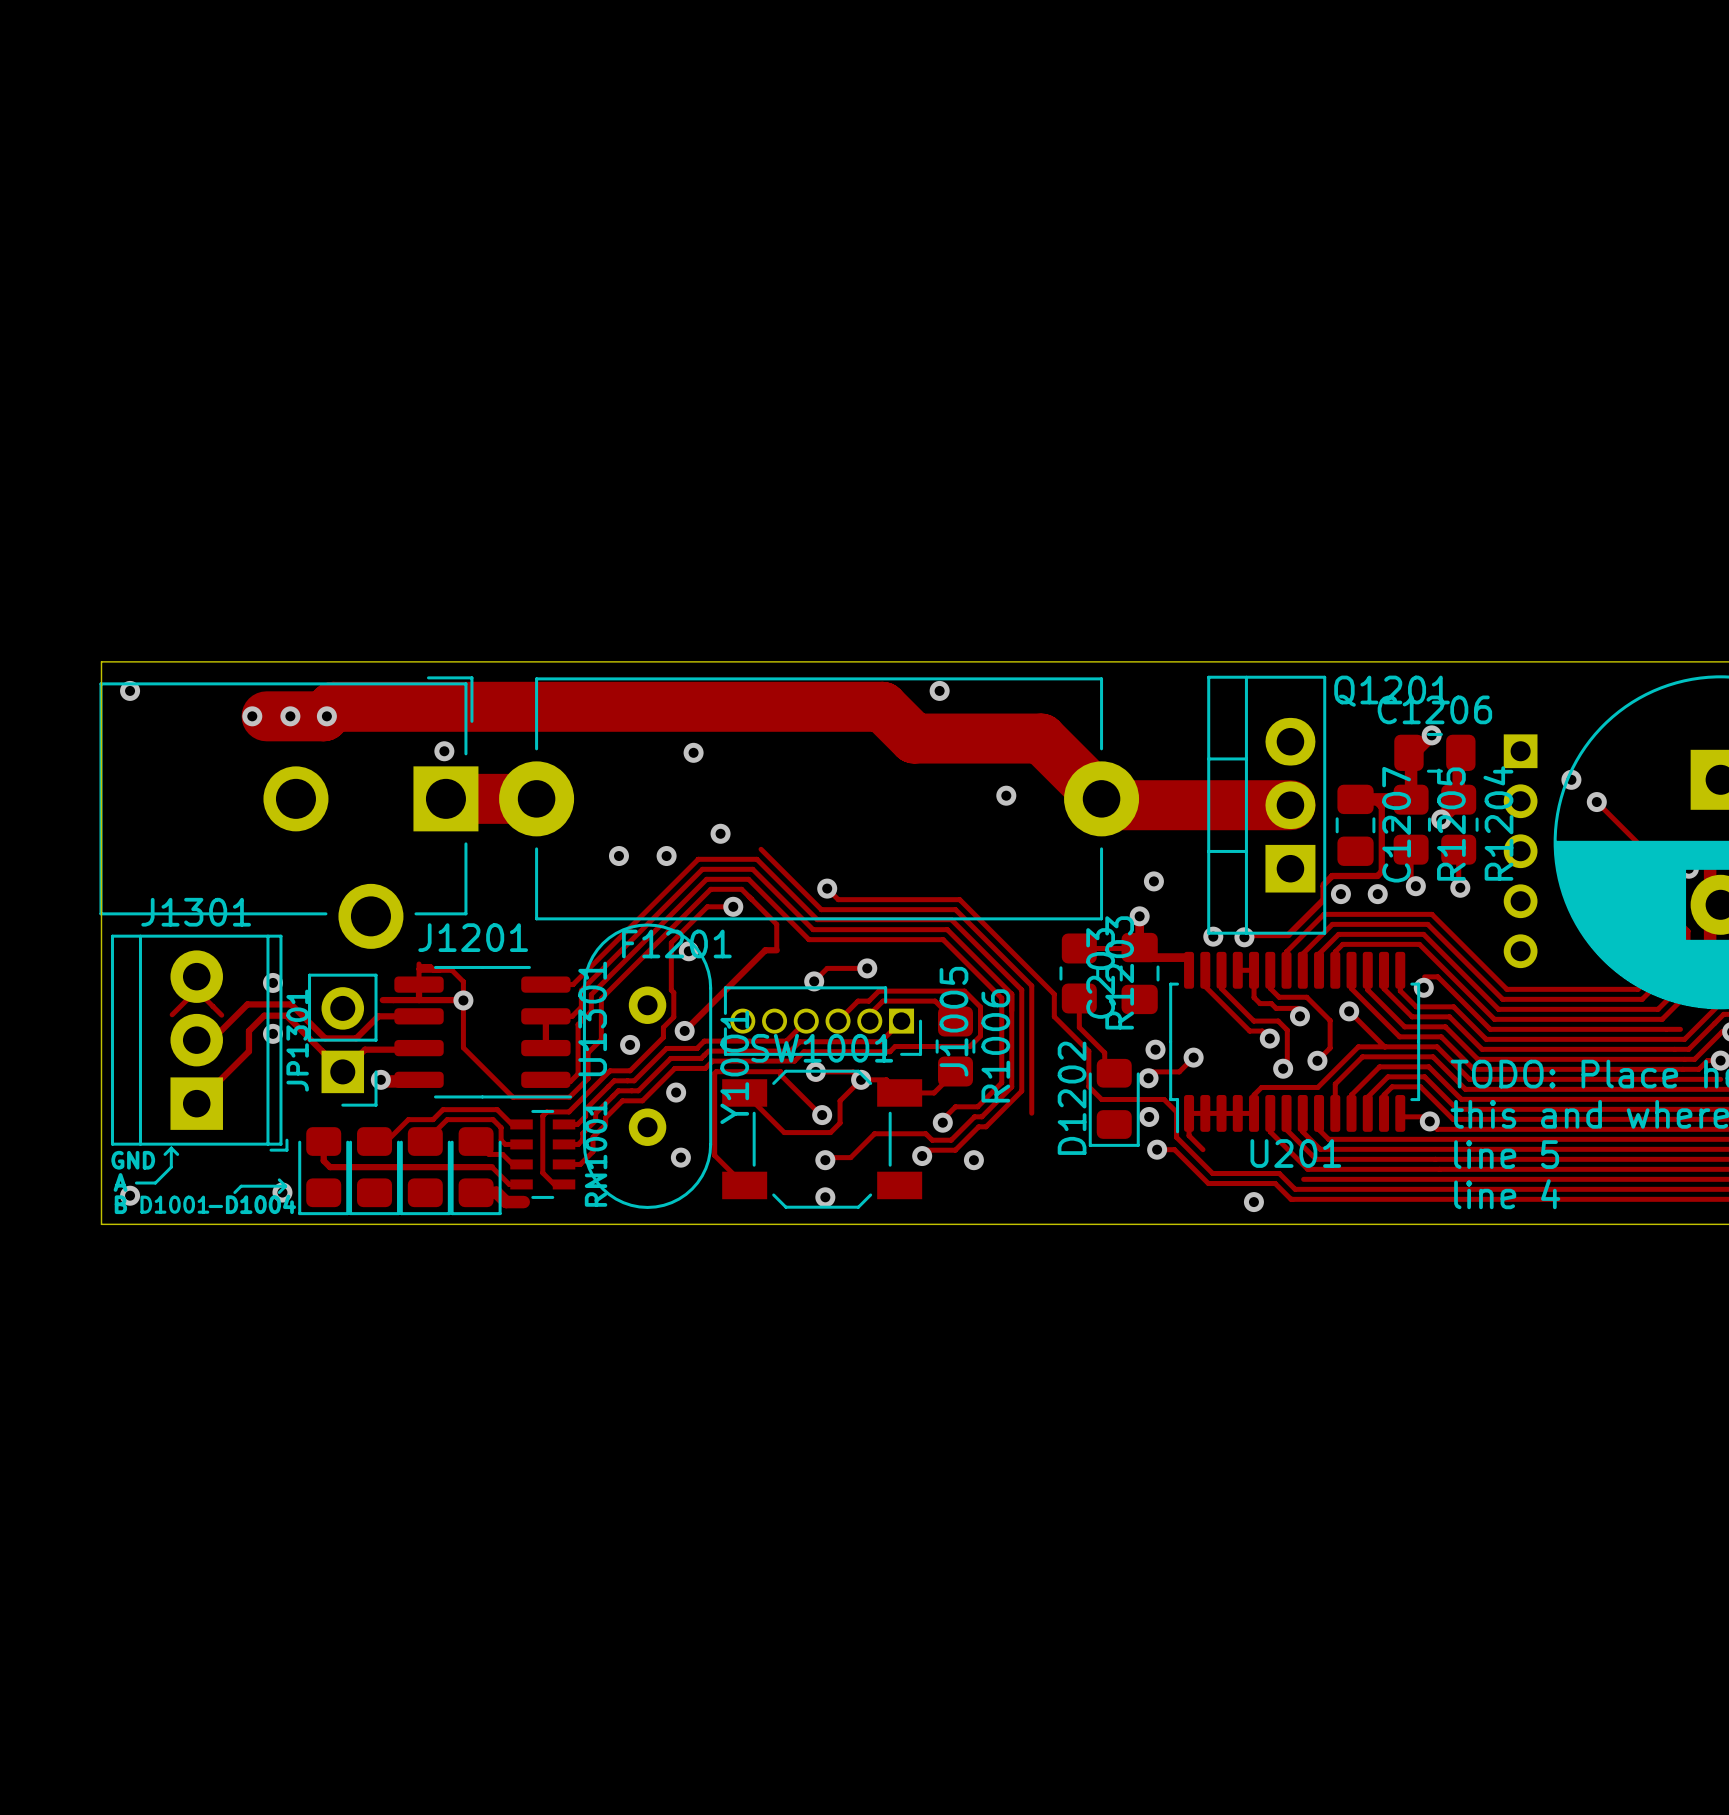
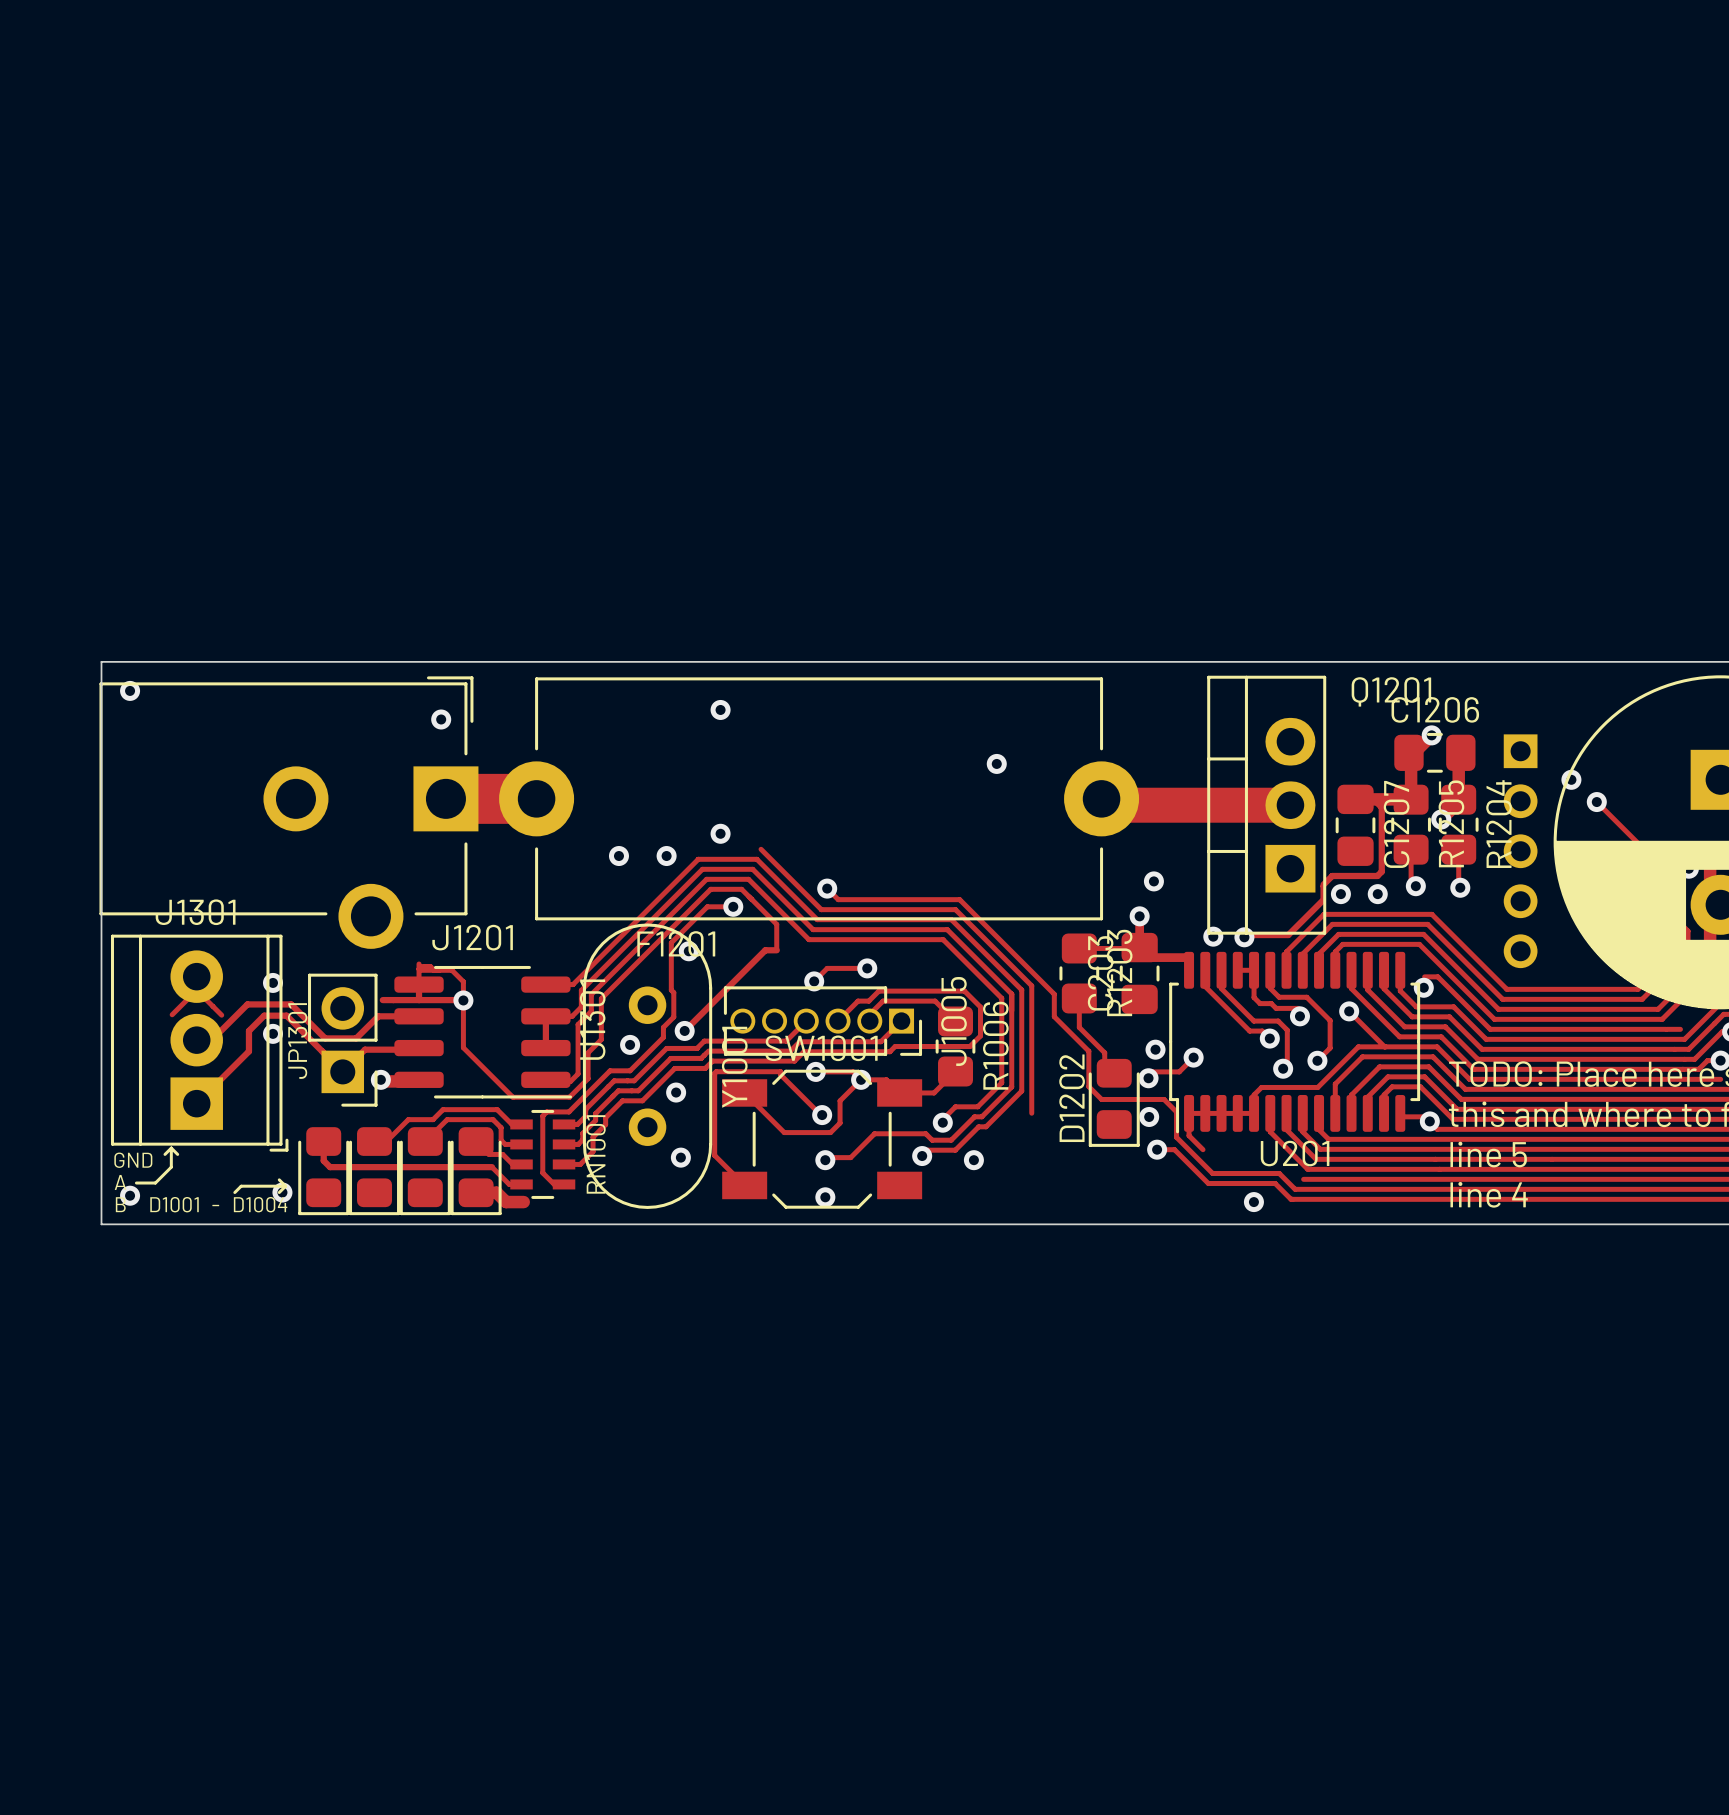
via: (939, 690) -> none
via: (252, 716) -> none
track: (266, 716) (323, 716) (333, 706) (882, 706) (914, 738) (1041, 738) (1101, 798) -> none
via: (290, 716) -> none
via: (326, 716) -> none
via position: (444, 751) -> (441, 719)
via position: (693, 752) -> (720, 709)
via position: (1006, 795) -> (996, 763)
track width: thick (1107, 805) (1290, 805) -> thin (1107, 805) (1290, 805)

